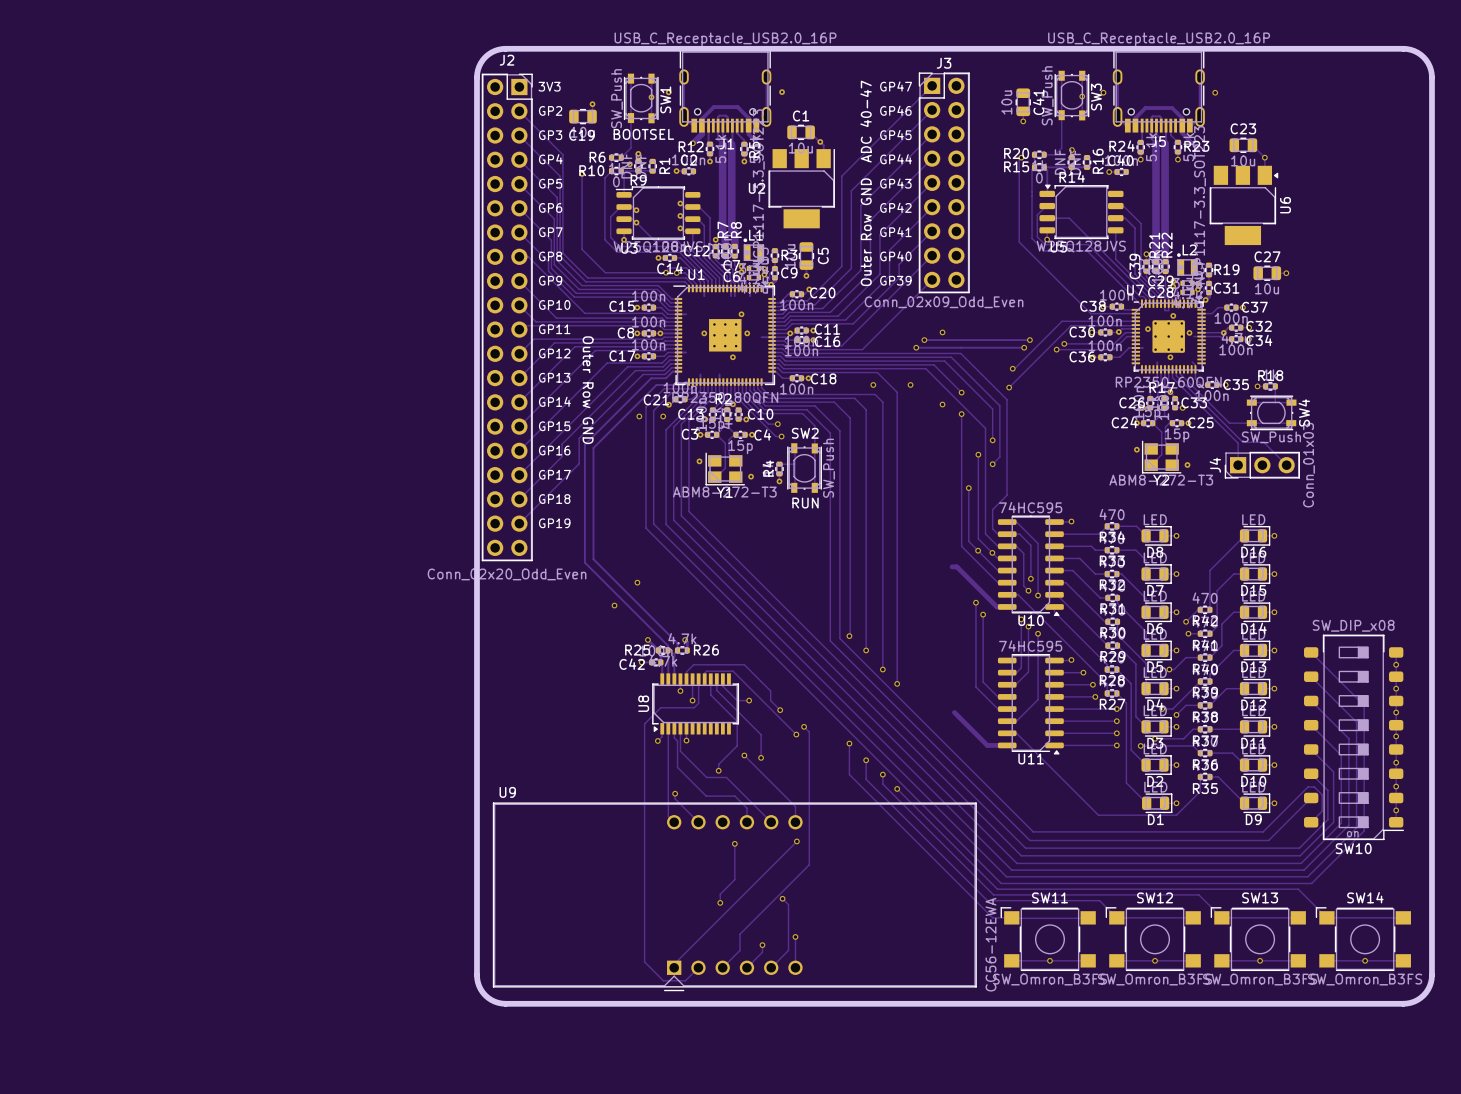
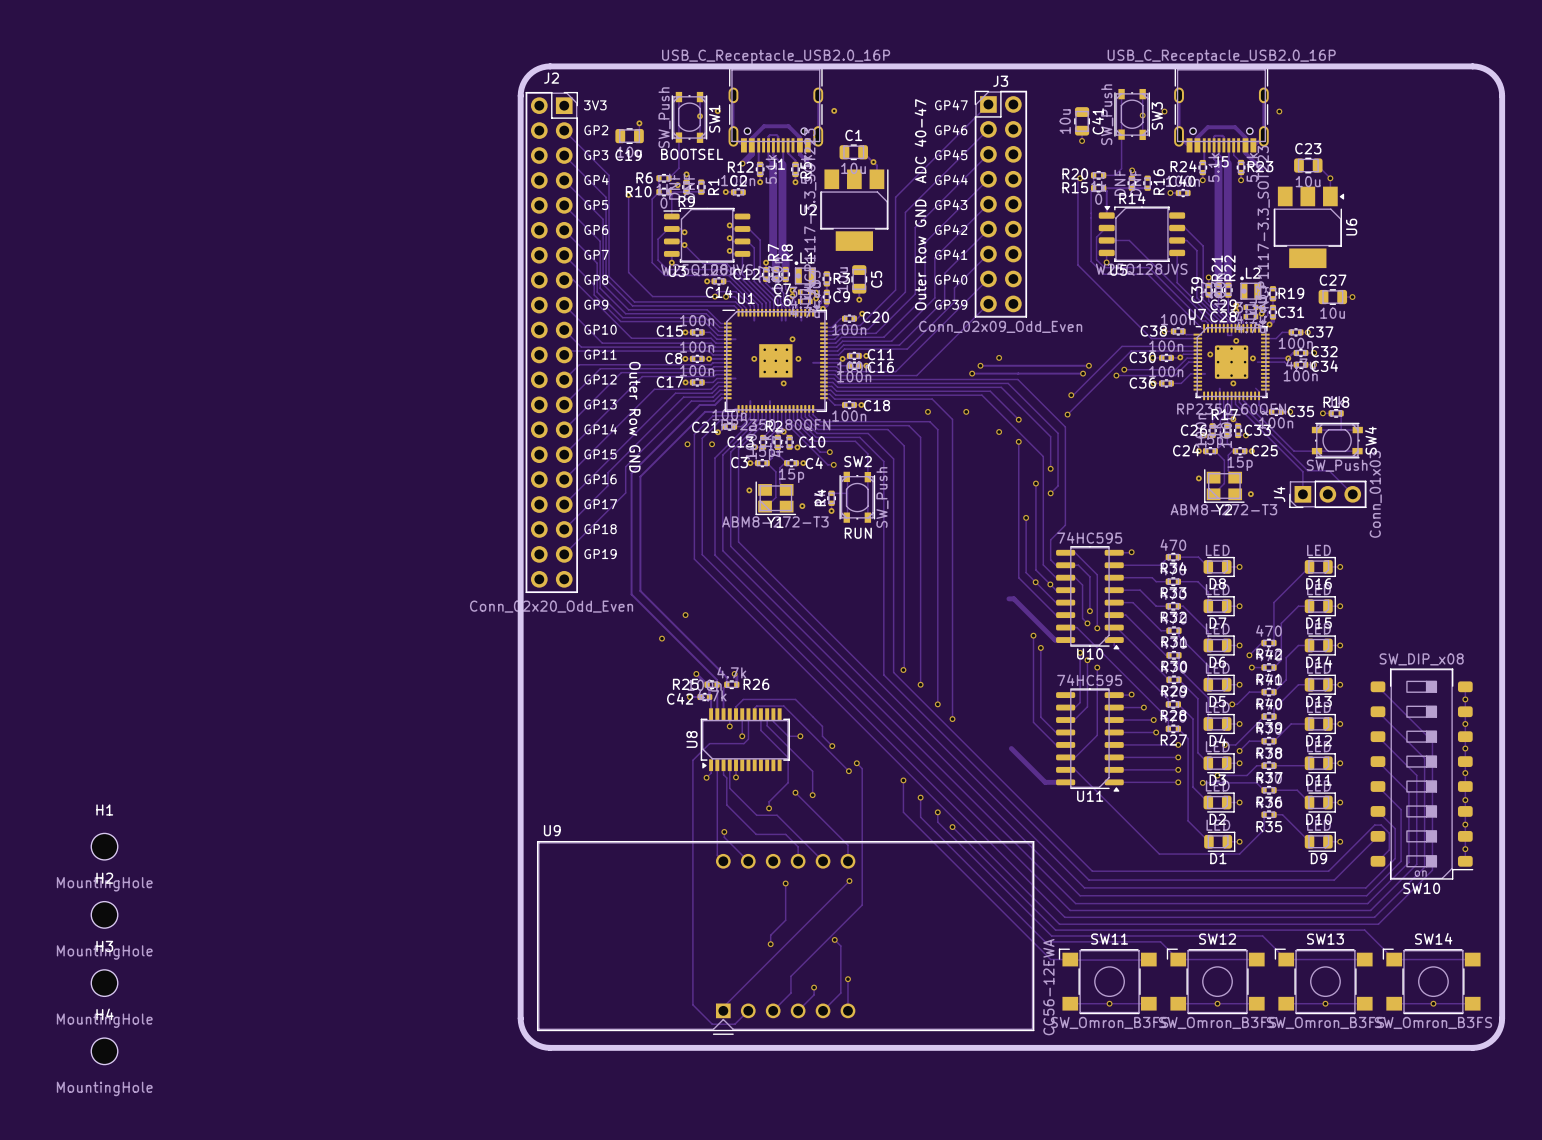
H1: none -> MountingHole (104, 846)
H2: none -> MountingHole (104, 914)
H3: none -> MountingHole (104, 983)
H4: none -> MountingHole (104, 1051)

